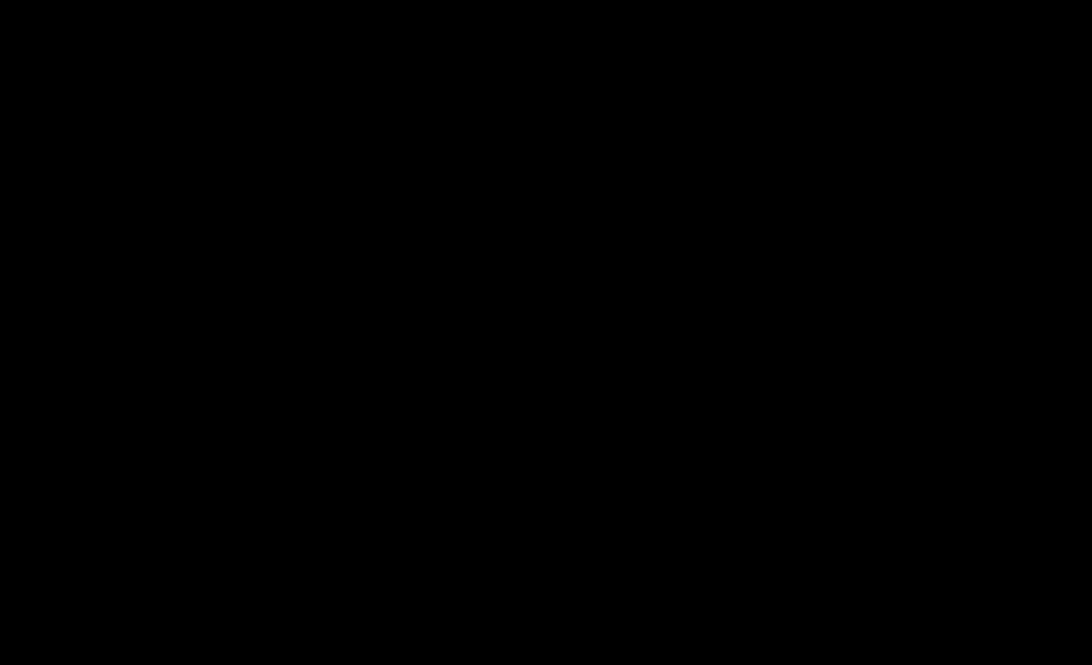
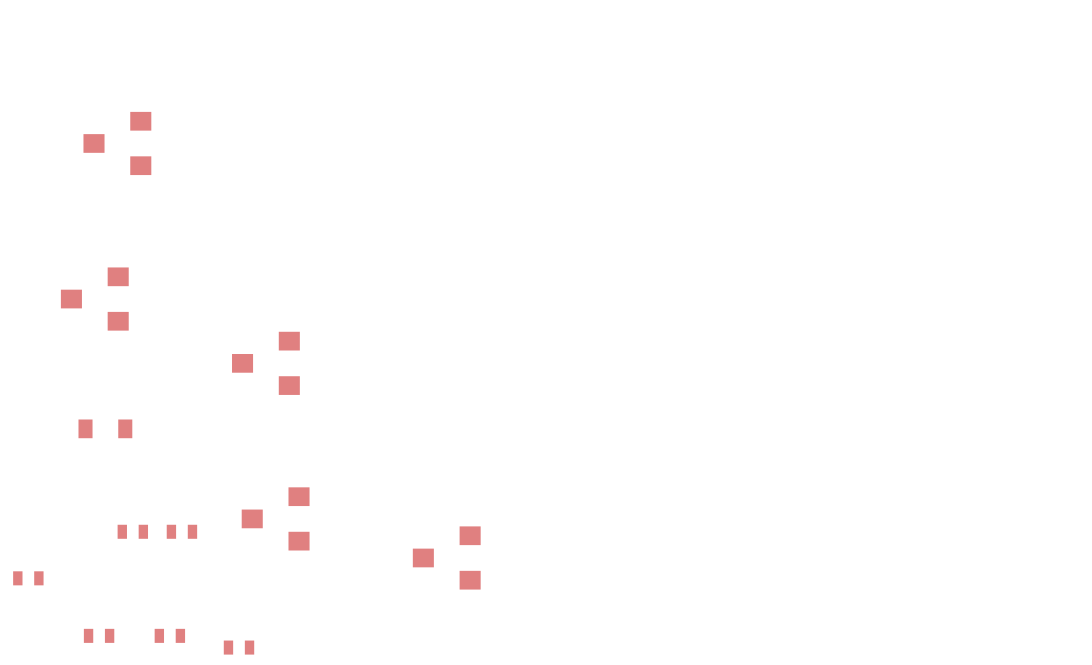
part: none -> (117, 143)
part: none -> (94, 299)
part: none -> (265, 363)
part: none -> (105, 428)
part: none -> (275, 518)
part: none -> (132, 531)
part: none -> (181, 531)
part: none -> (446, 557)
part: none -> (28, 578)
part: none -> (99, 635)
part: none -> (169, 635)
part: none -> (238, 647)

